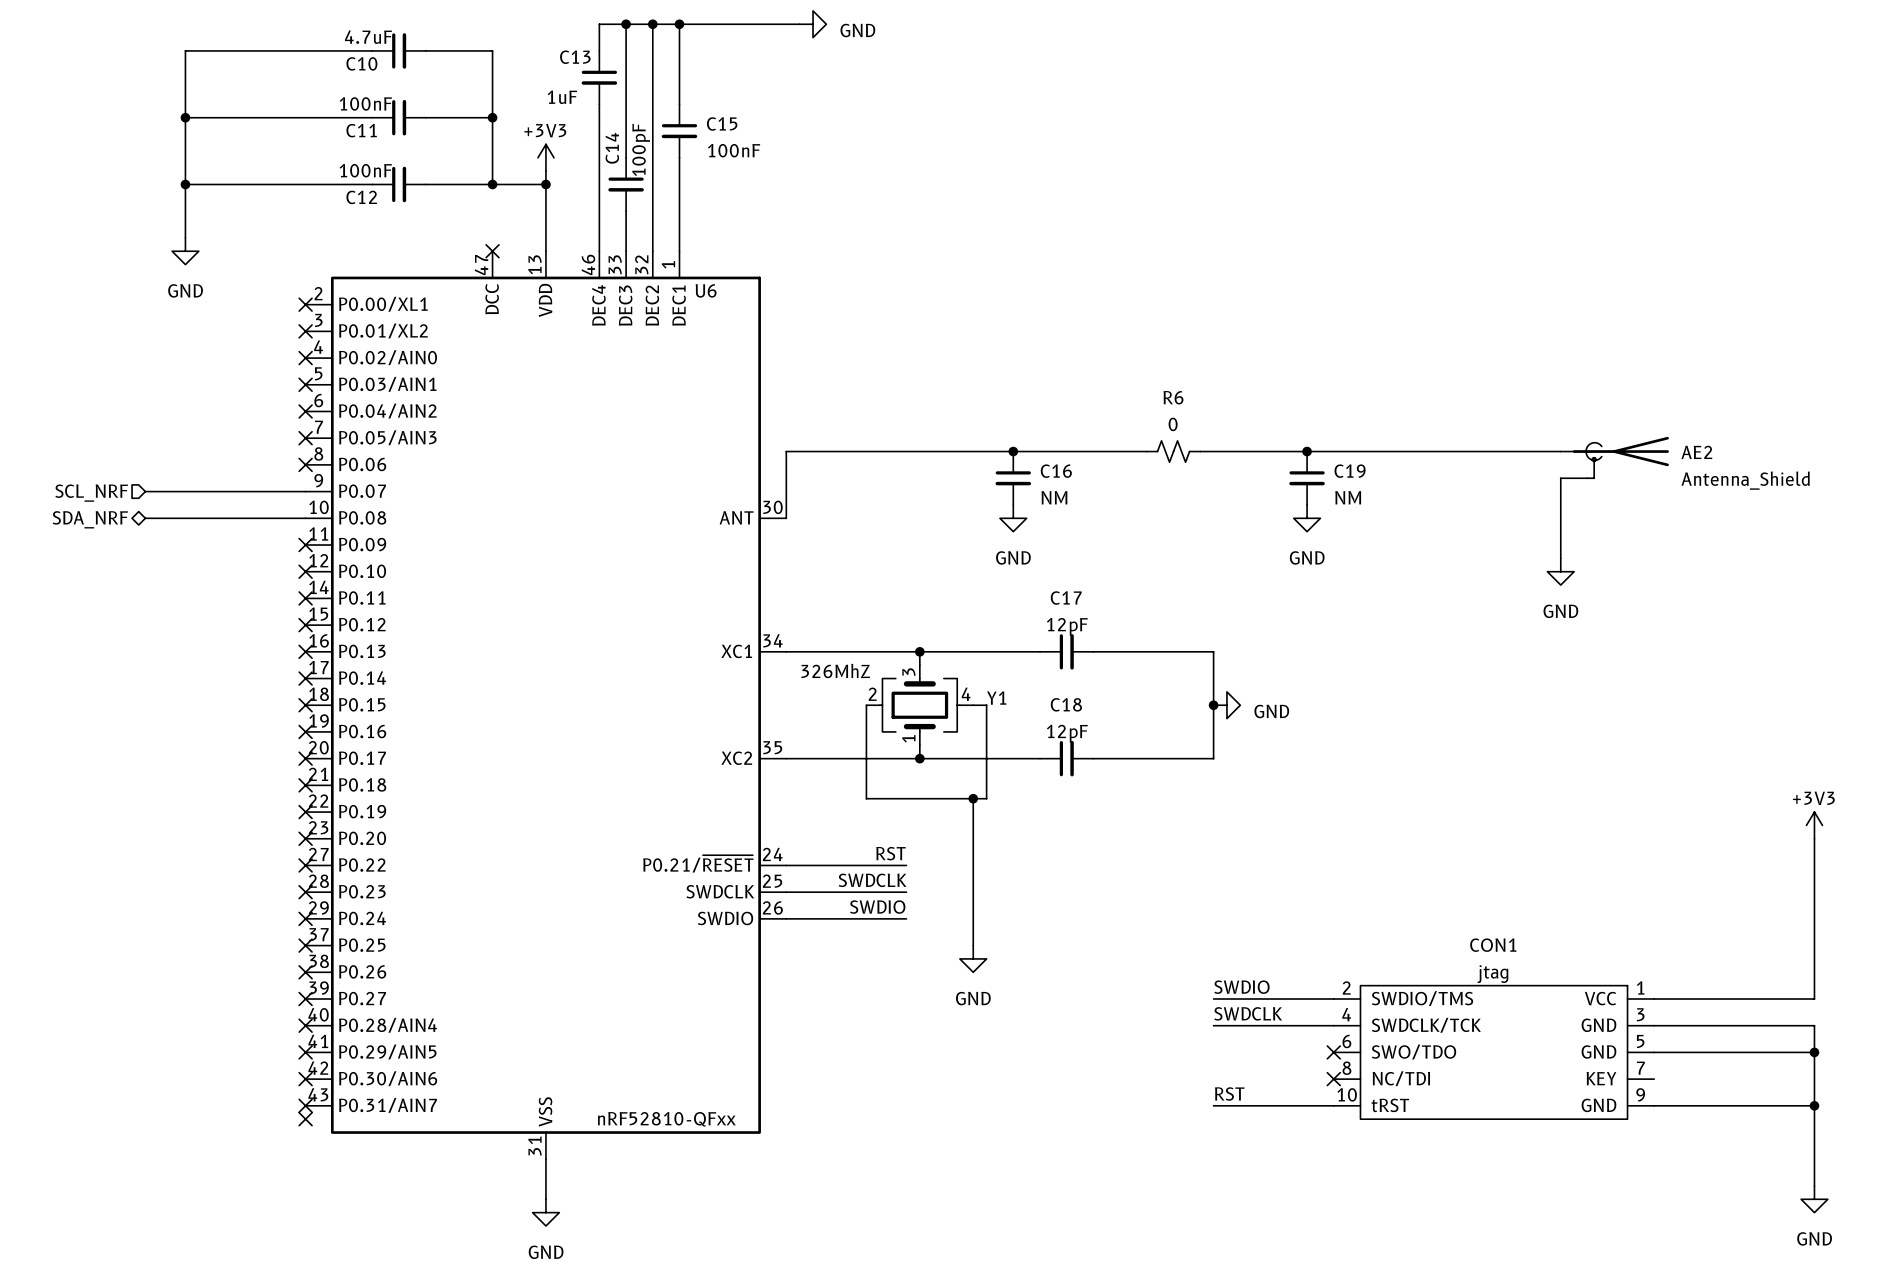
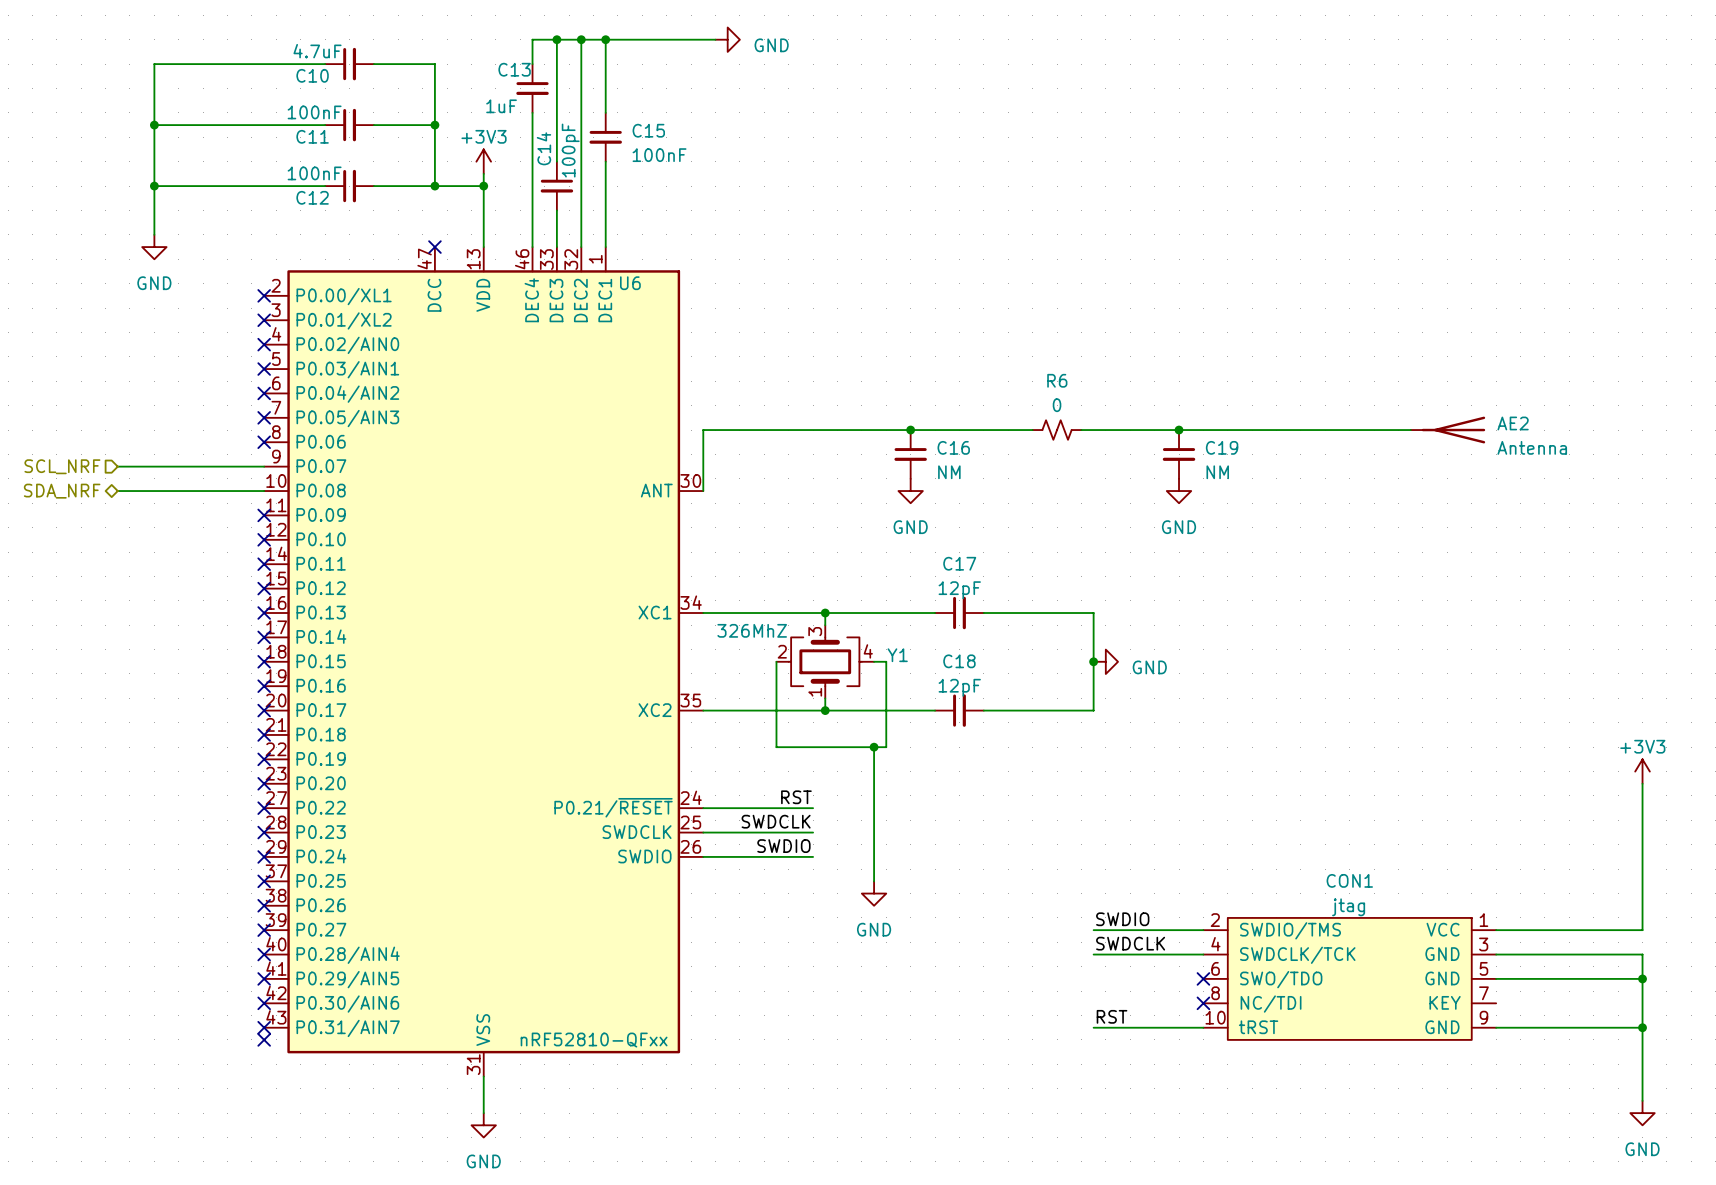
AE2 symbol: [1560, 436, 1669, 479] -> [1410, 416, 1486, 444]
wire: (1560, 478) (1560, 558) -> none
AE2 value: Antenna_Shield (1745, 480) -> Antenna (1532, 447)
power symbol: GND (1560, 571) -> none

